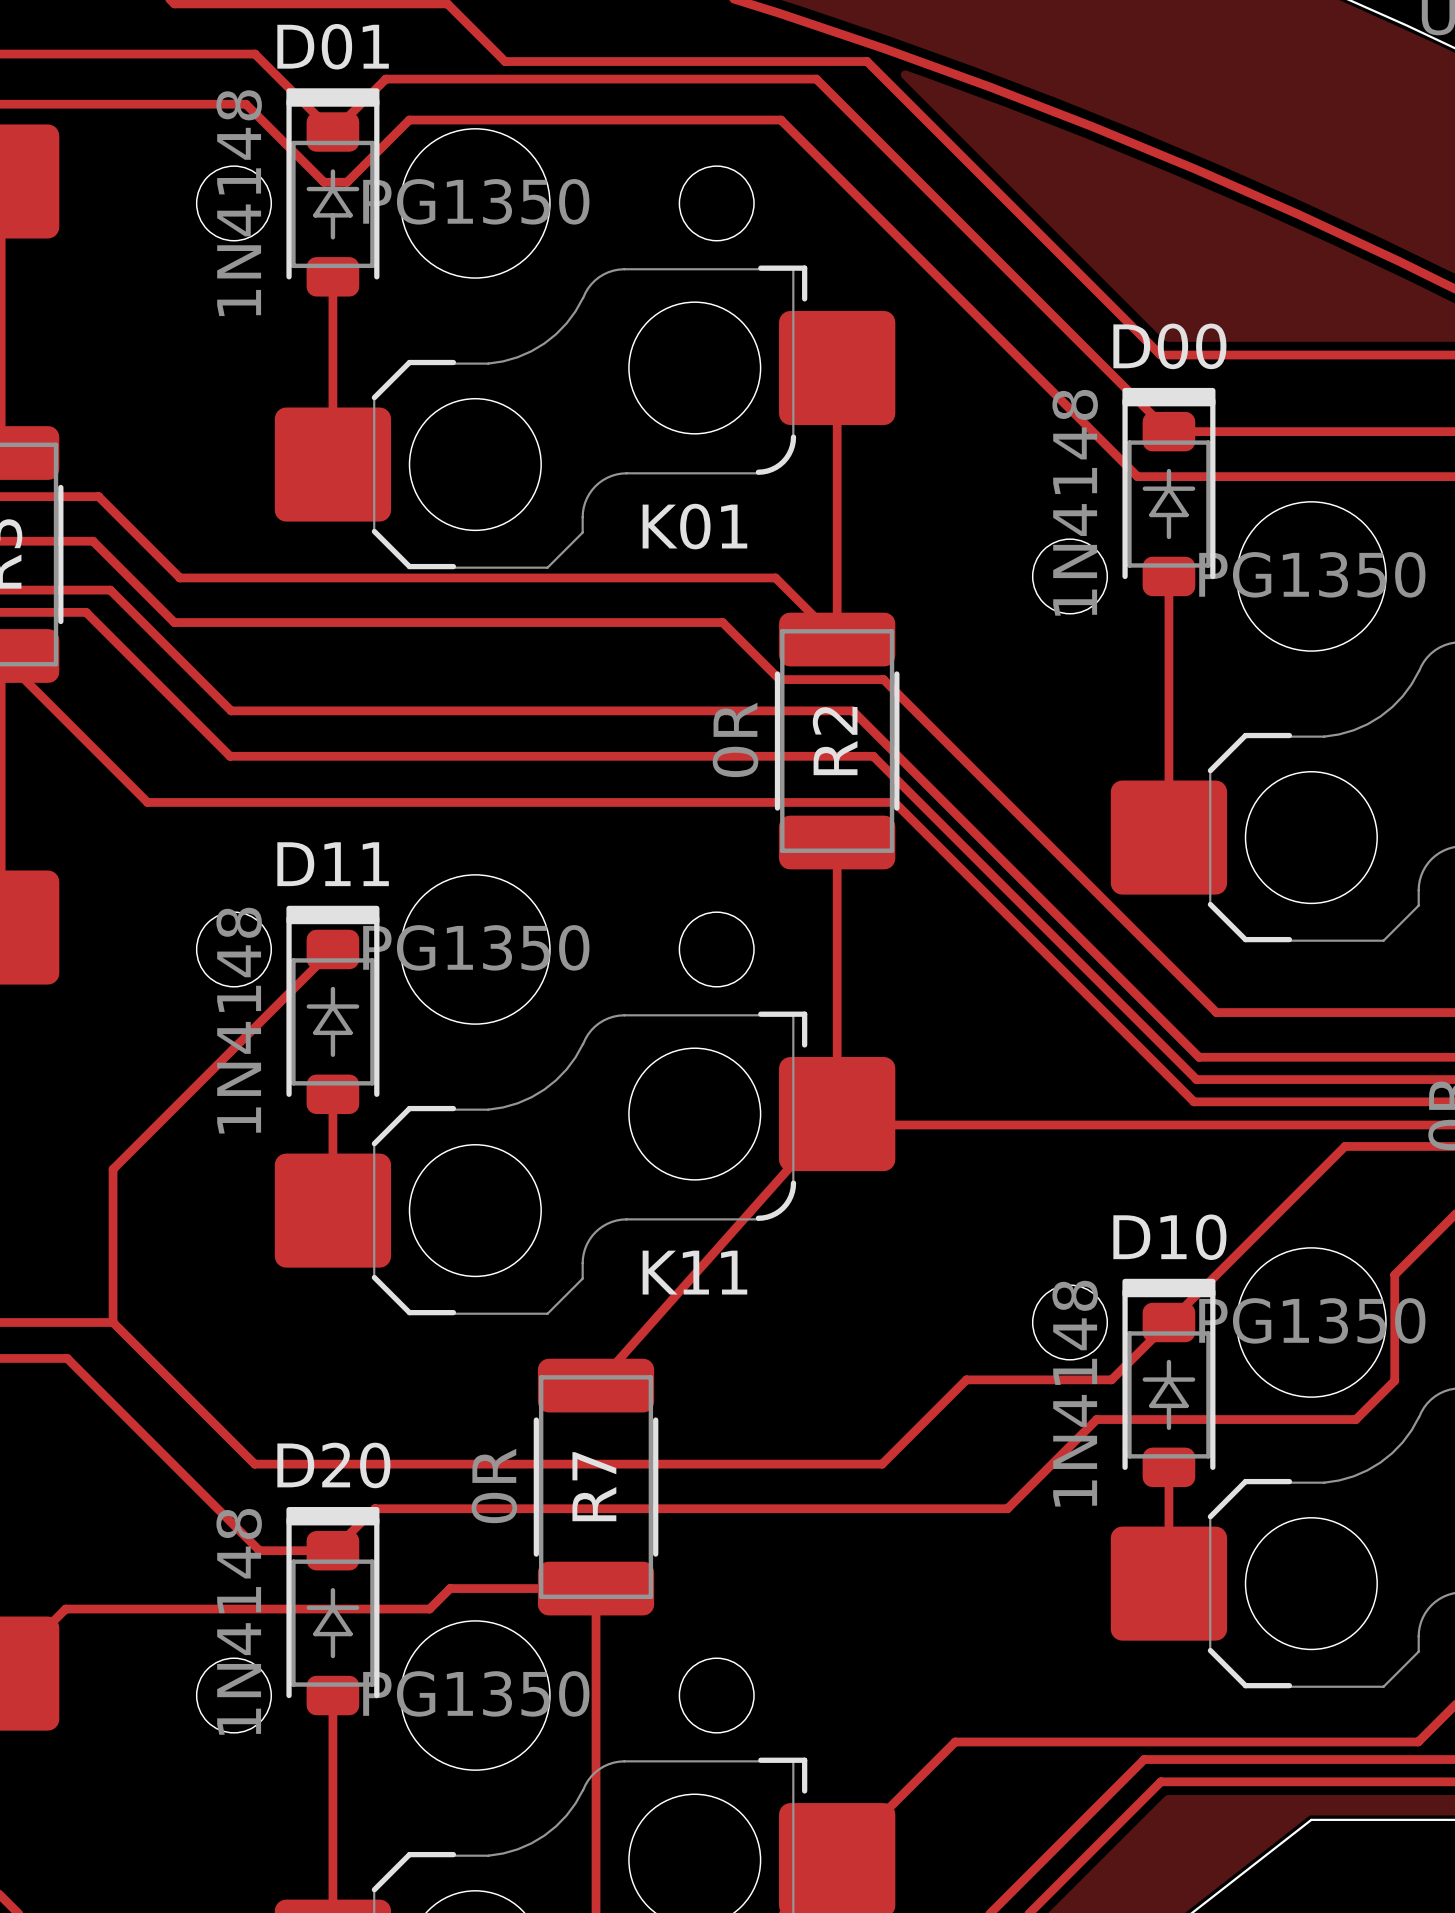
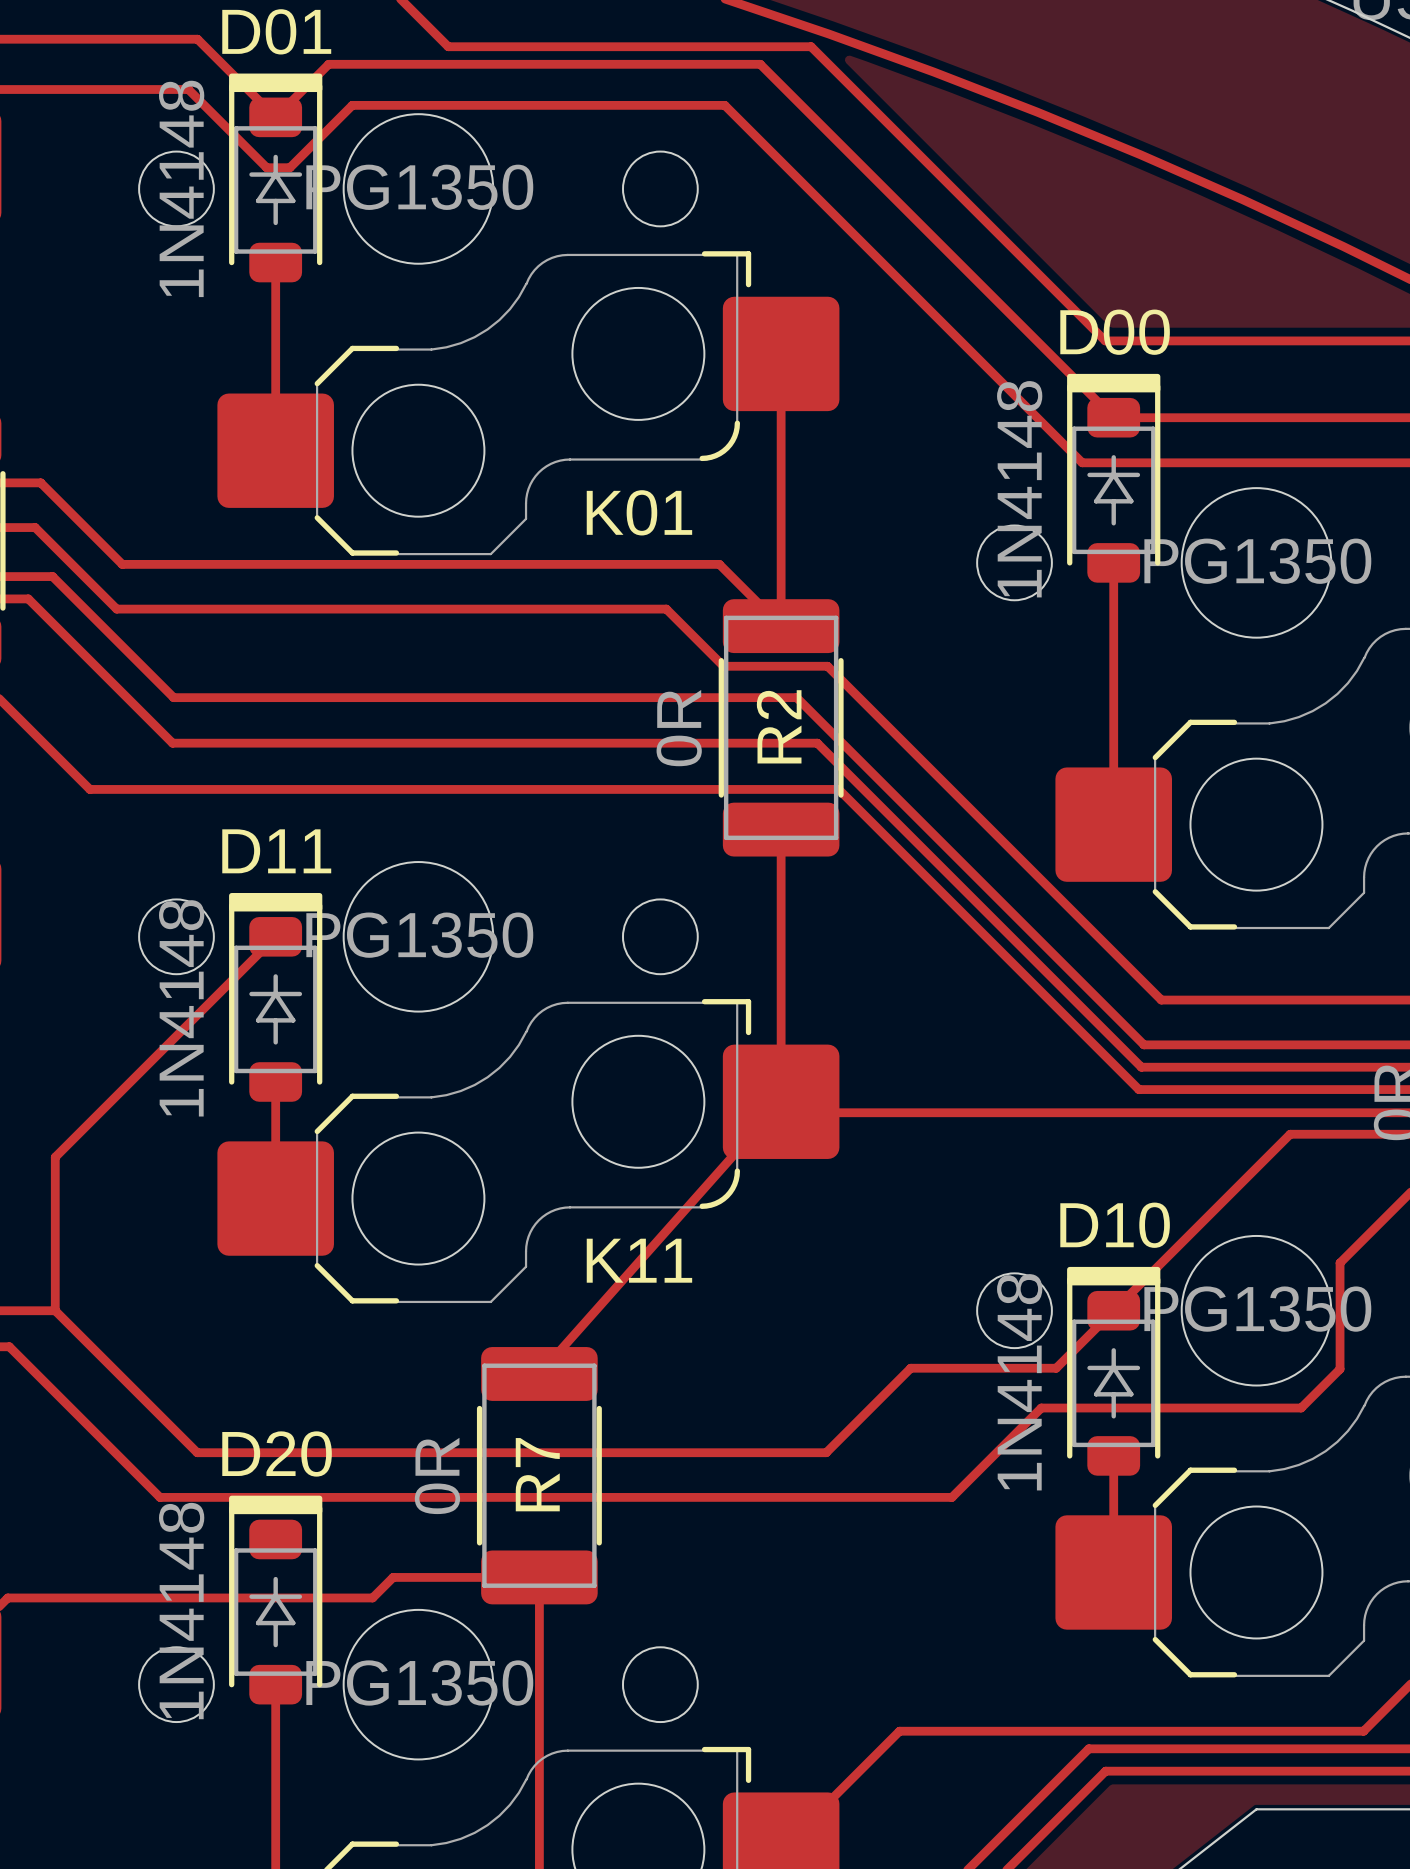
track: (217, 1508) (259, 1550) (332, 1550) (374, 1508) -> (160, 1497) (317, 1497)

